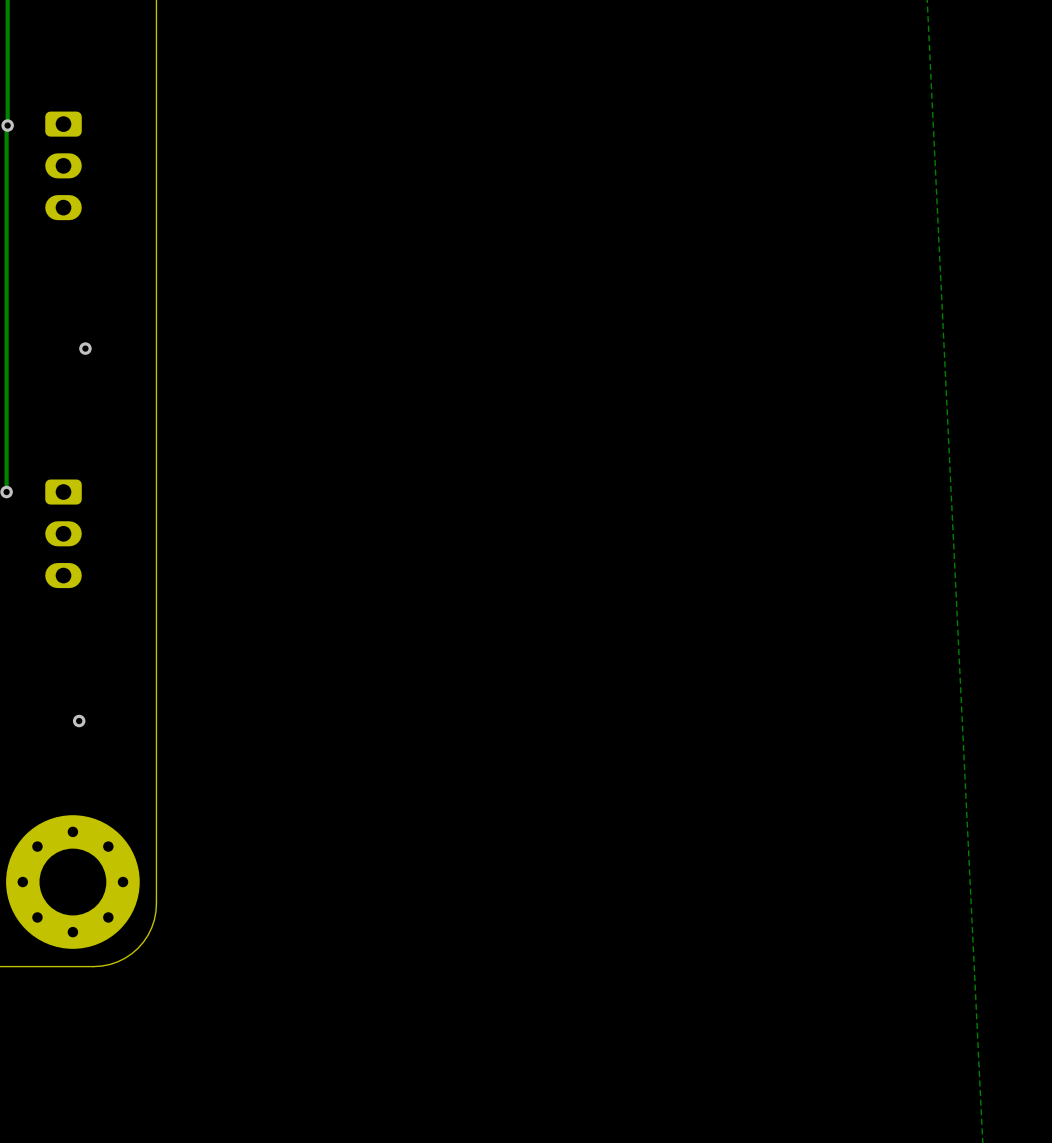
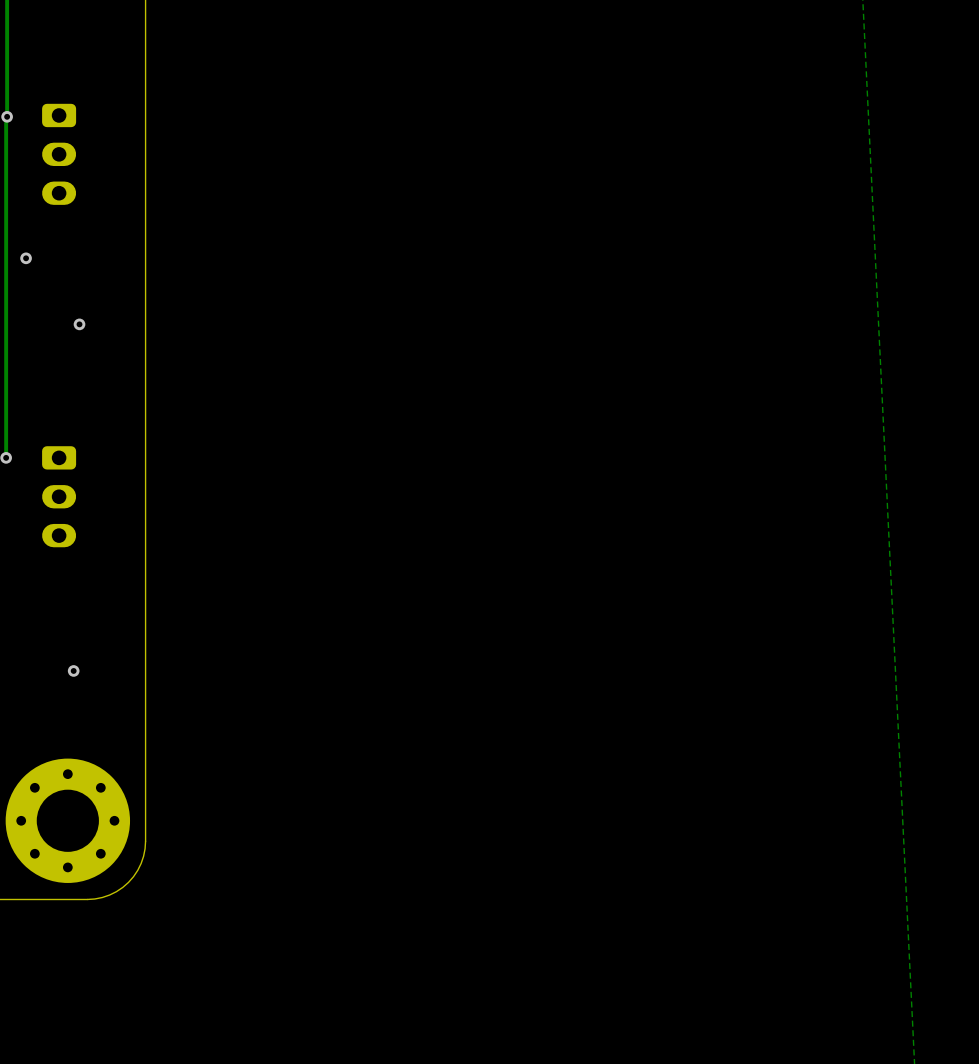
via: none -> (26, 258)

